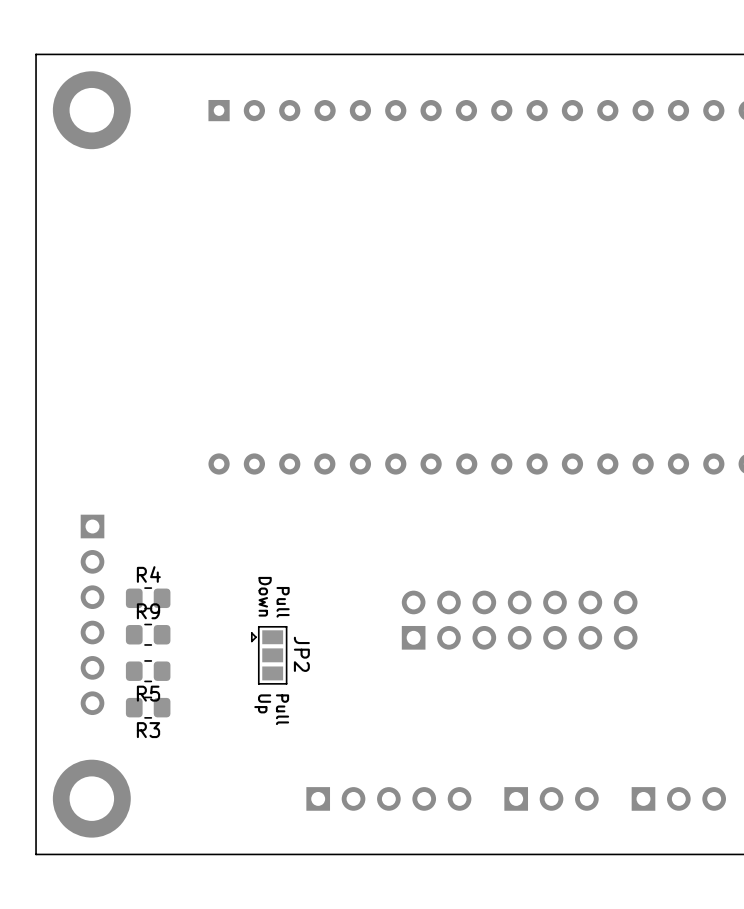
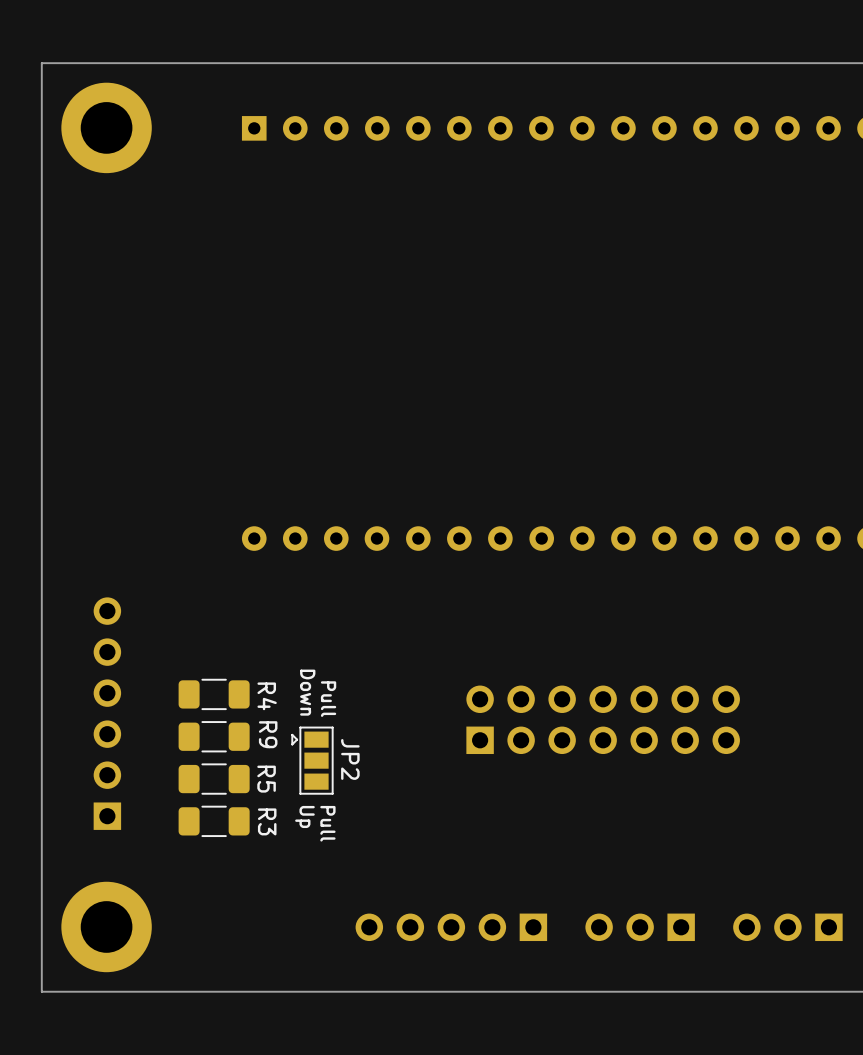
R4 name position: R4 (148, 574) -> R4 (267, 696)
R4 footprint: [125, 587, 171, 610] -> [178, 678, 250, 711]
R9 name position: R9 (148, 611) -> R9 (268, 734)
part rotation: 0° (92, 614) -> 180° (107, 713)
R9 footprint: [125, 623, 171, 646] -> [178, 721, 250, 753]
R5 footprint: [125, 660, 171, 683] -> [178, 763, 250, 795]
R5 name position: R5 (148, 693) -> R5 (266, 779)
R3 footprint: [125, 696, 171, 719] -> [178, 805, 250, 838]
R3 name position: R3 (148, 730) -> R3 (267, 821)
part rotation: 0° (388, 798) -> 180° (451, 927)
part rotation: 0° (551, 798) -> 180° (640, 927)
part rotation: 0° (678, 798) -> 180° (787, 927)

